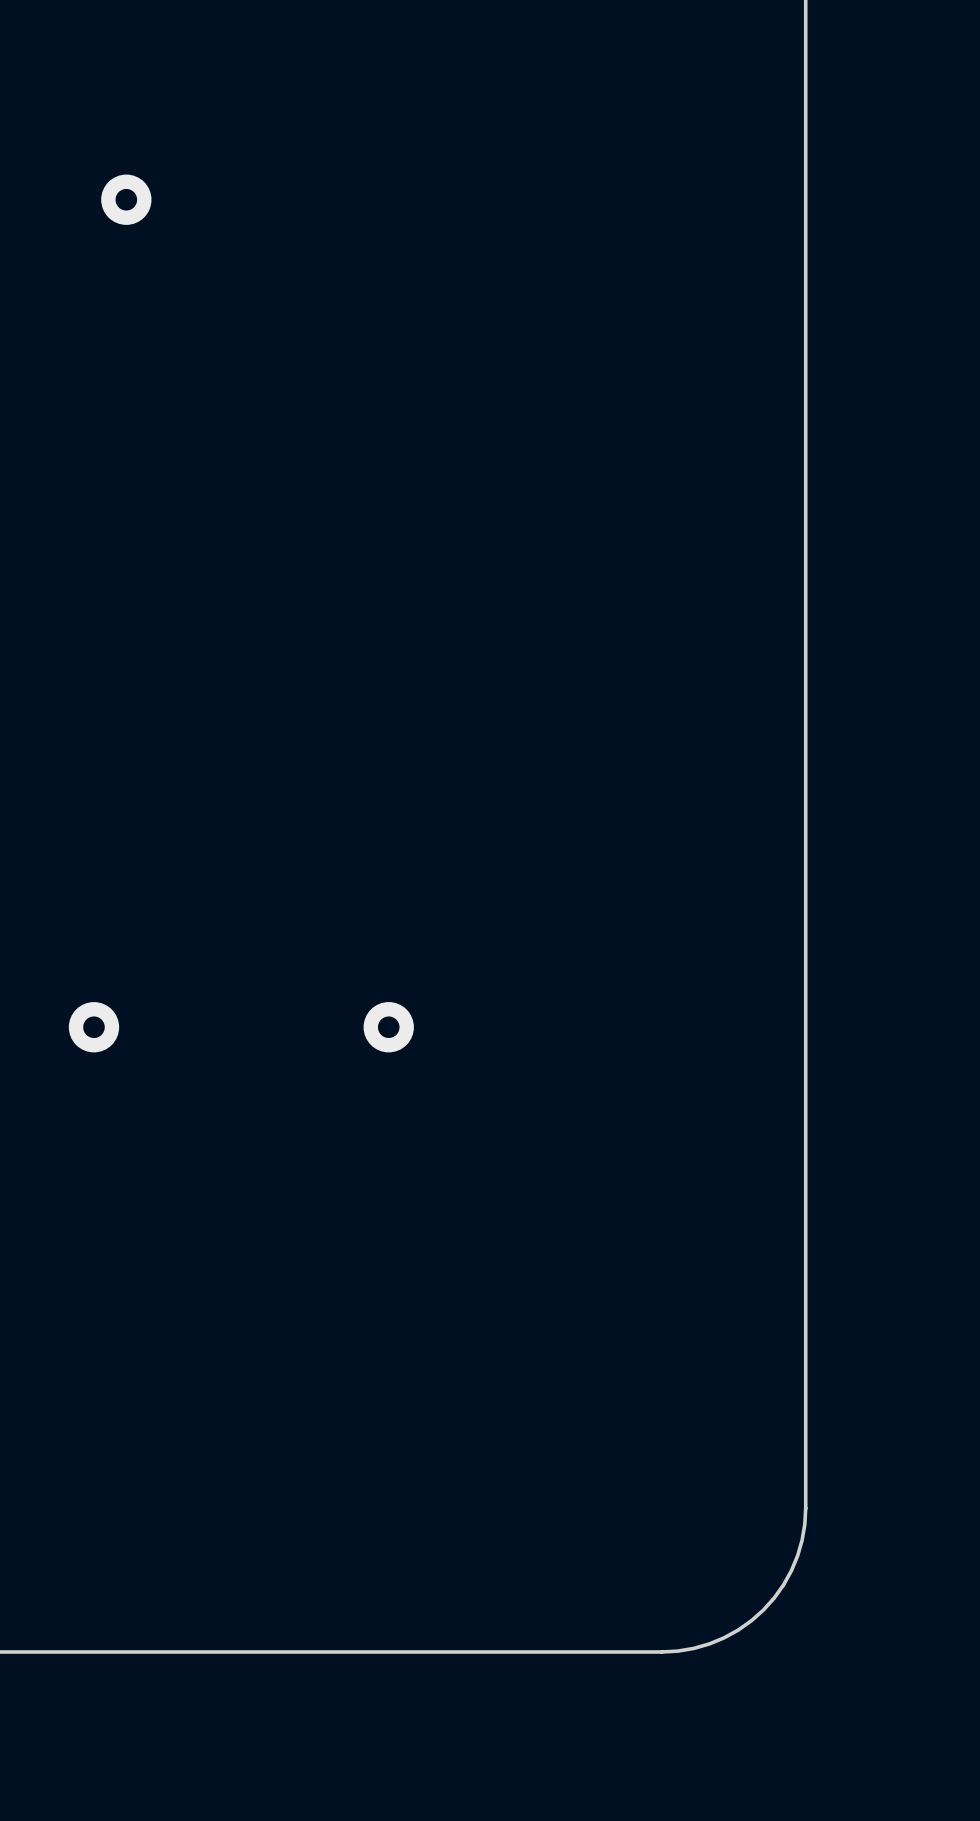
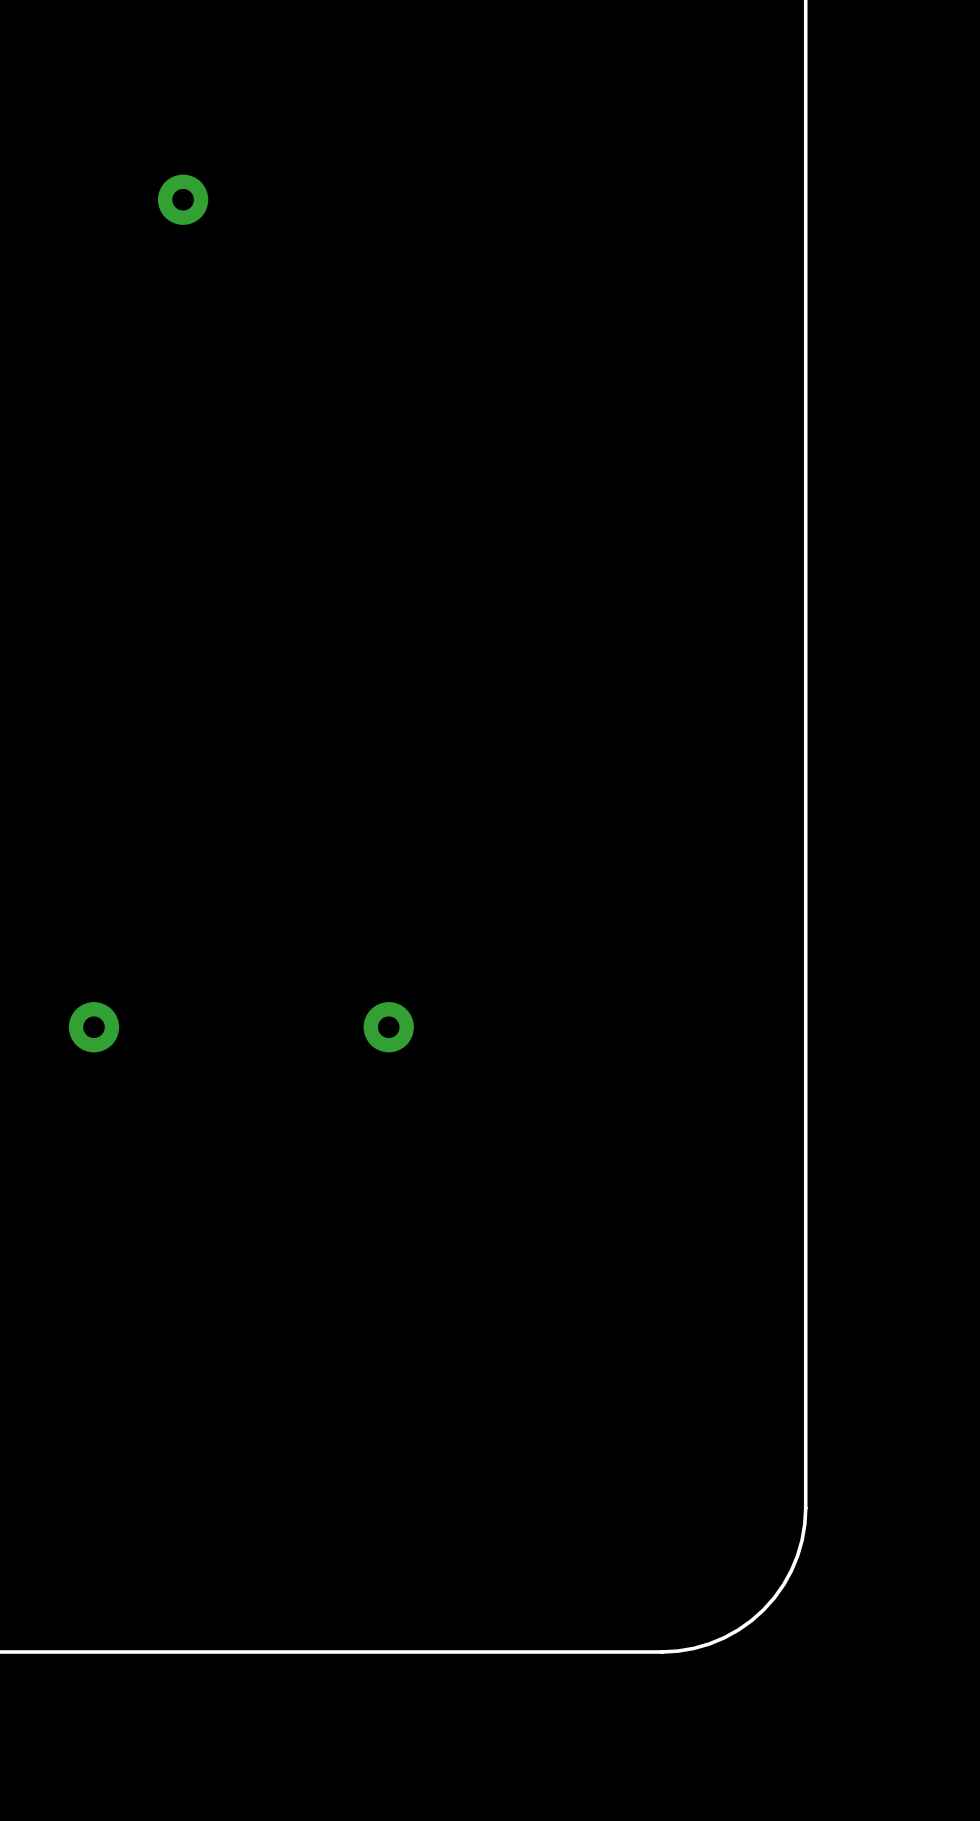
via position: (126, 199) -> (183, 199)

